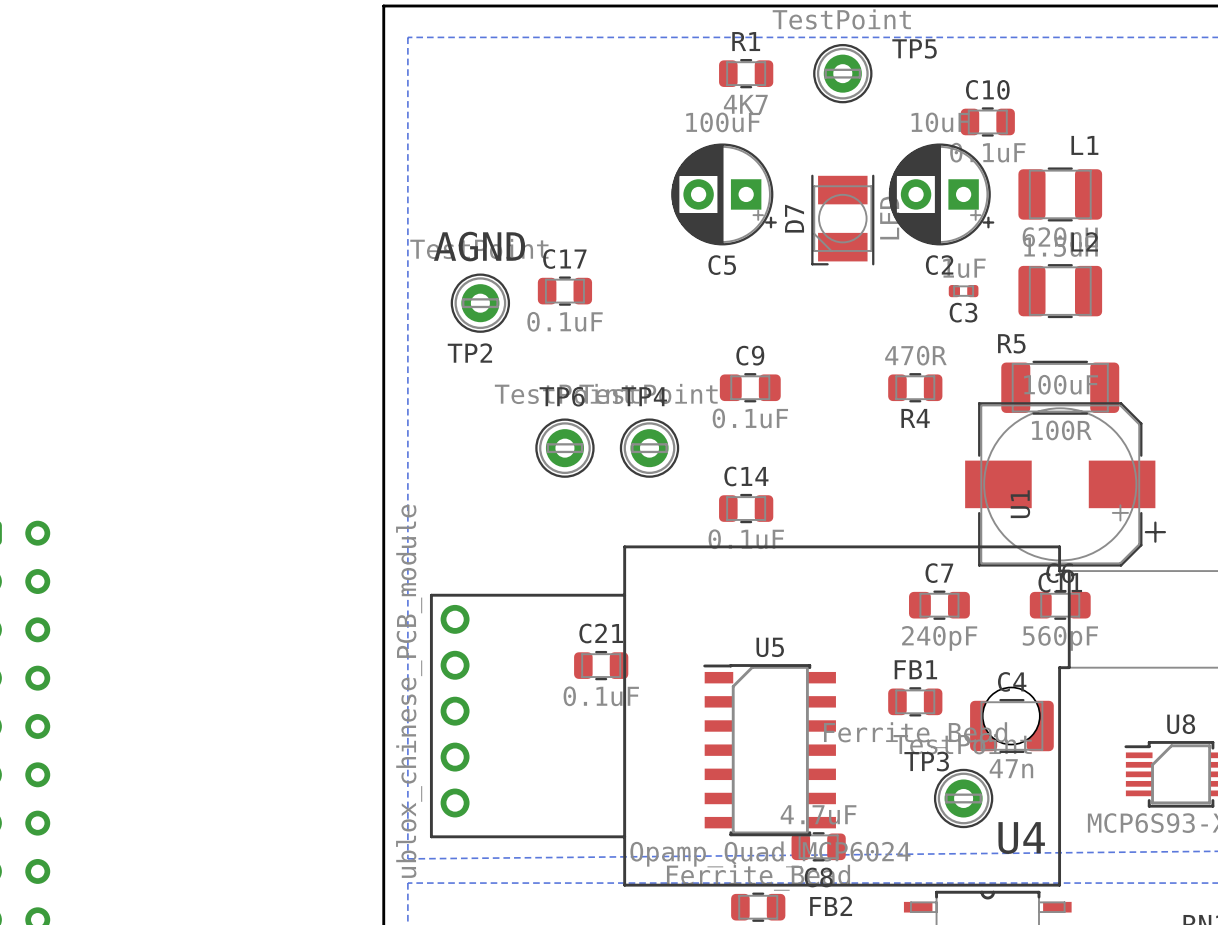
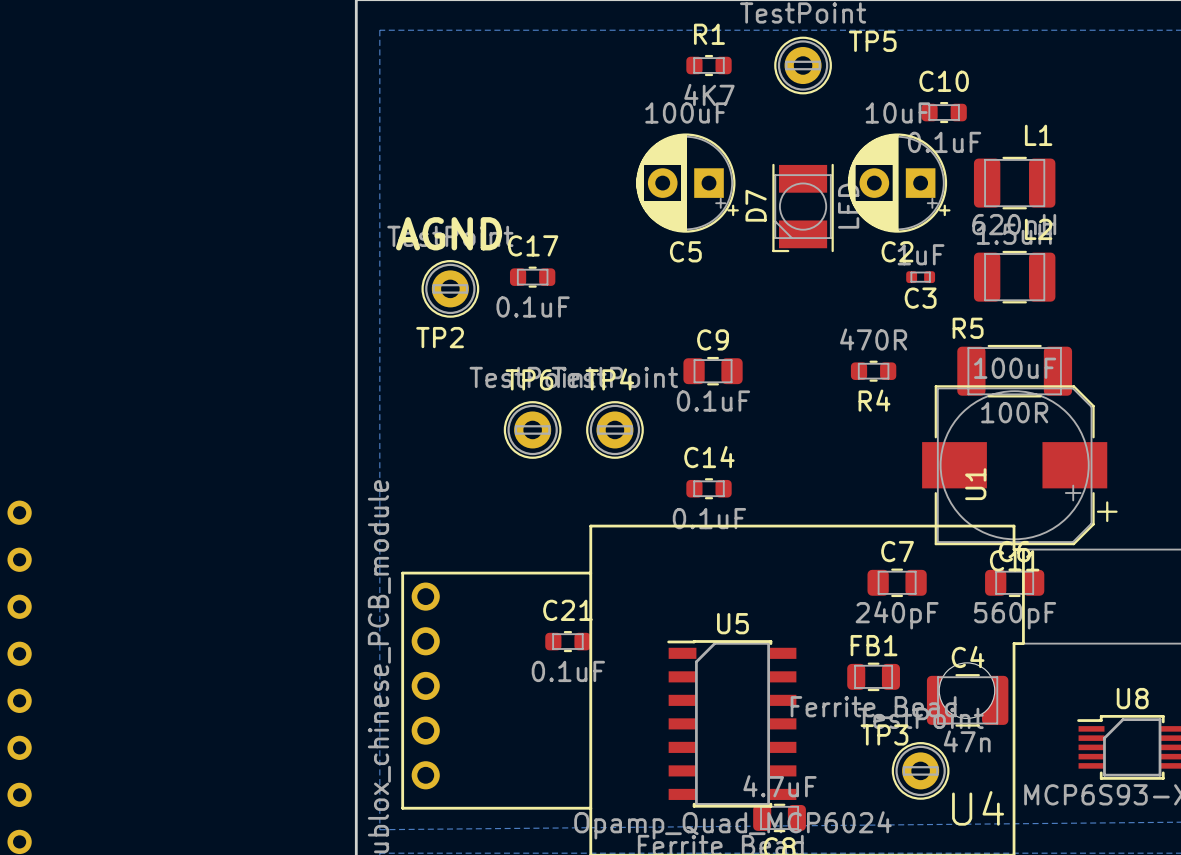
R1 footprint: [719, 59, 774, 89] -> [686, 54, 732, 77]
C10 footprint: [960, 107, 1015, 137] -> [921, 101, 967, 124]
C17 footprint: [537, 276, 593, 306] -> [509, 266, 556, 288]
R4 footprint: [888, 373, 943, 403] -> [850, 360, 897, 382]
C14 footprint: [719, 493, 774, 524] -> [686, 478, 732, 500]
C21 footprint: [574, 650, 629, 681] -> [545, 631, 591, 653]

